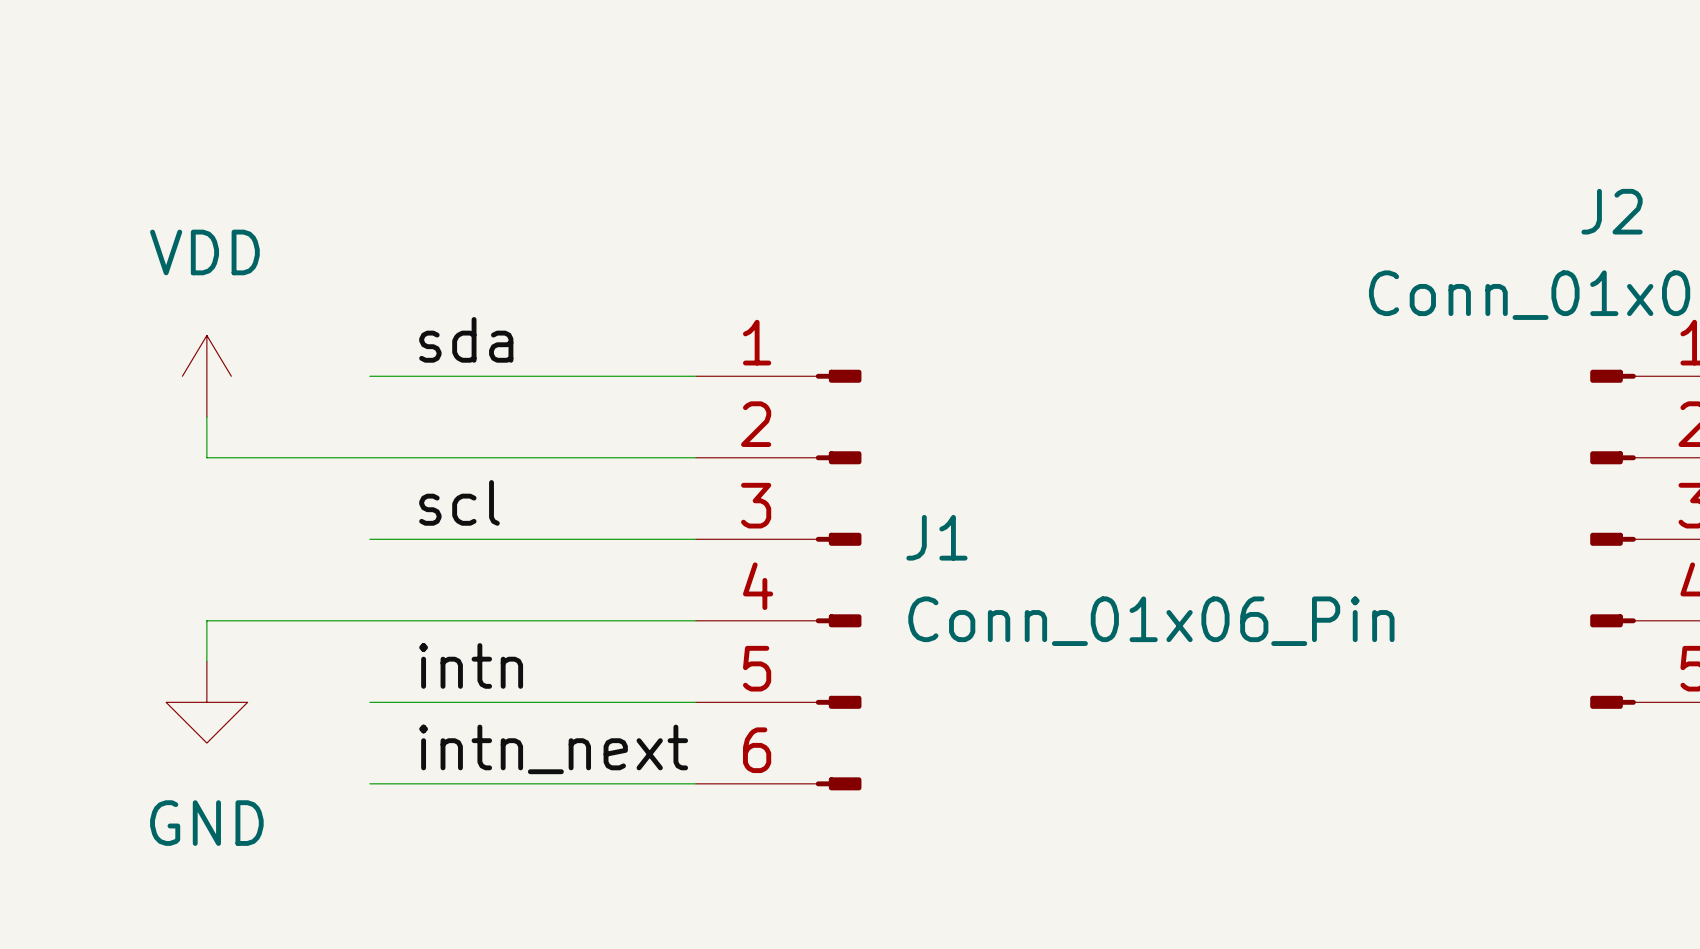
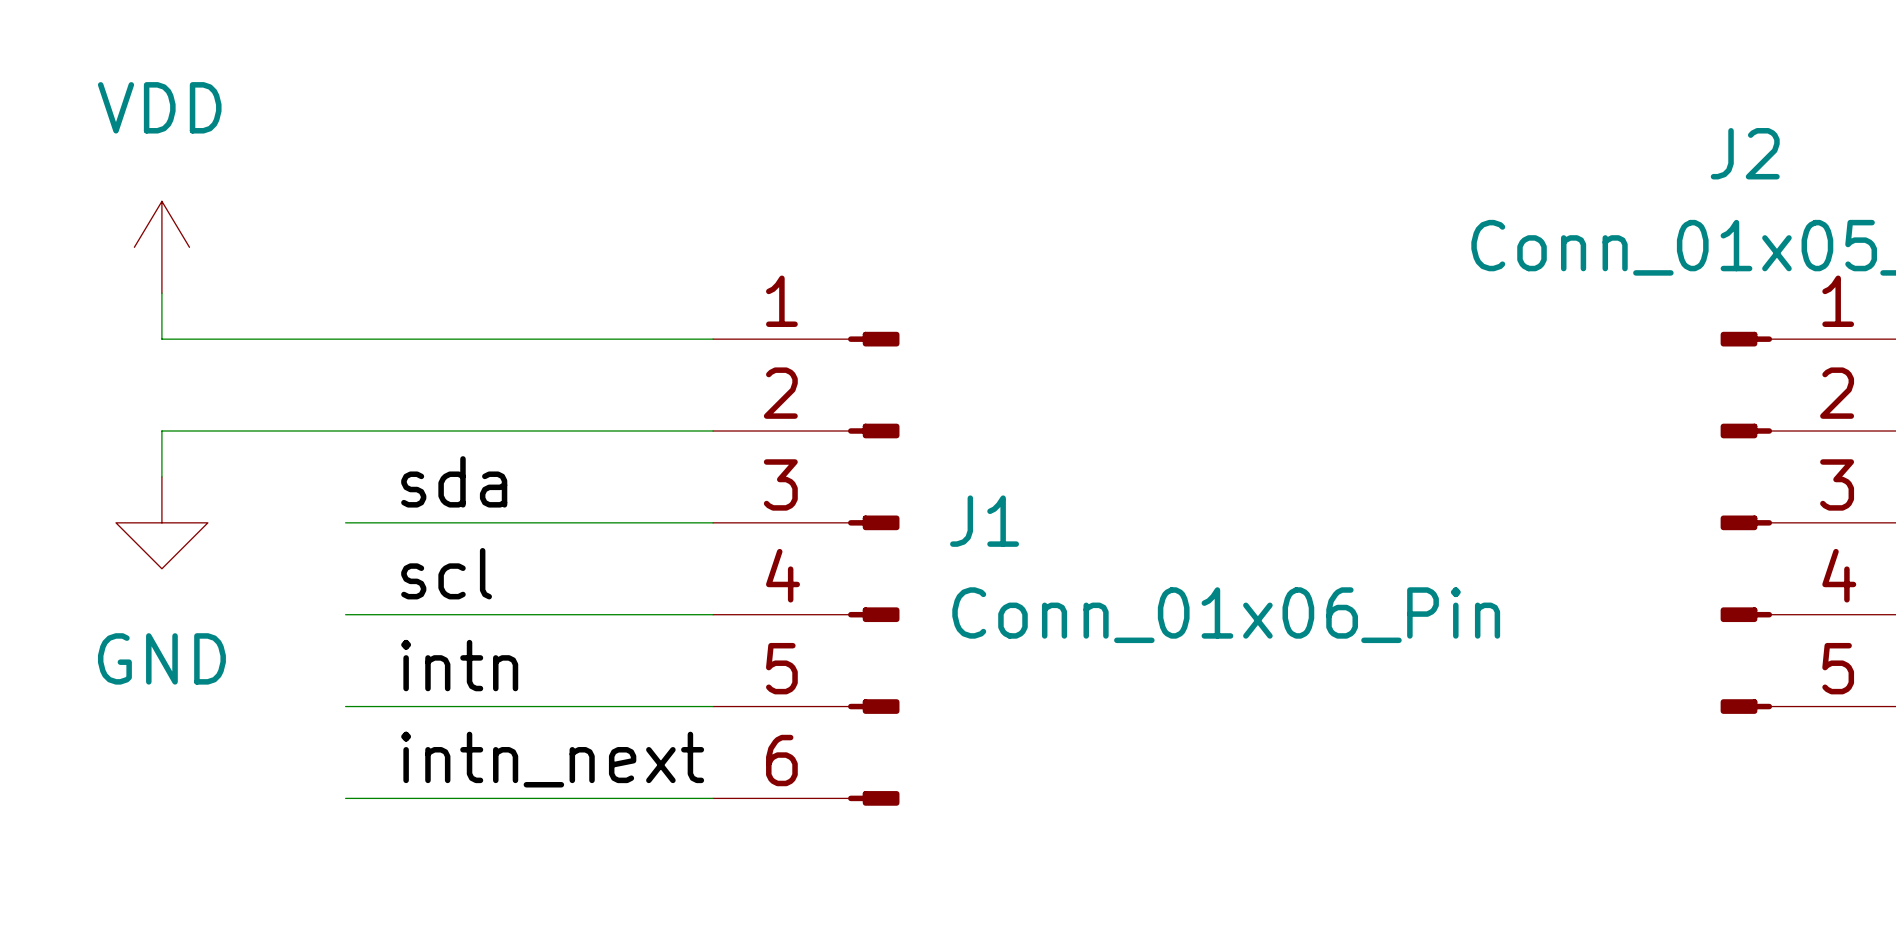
wire: none -> (161, 293) (161, 339) (345, 339)
label: sda (466, 339) -> none
power symbol position: VDD (206, 376) -> VDD (161, 247)
wire: (206, 417) (206, 457) -> (161, 476) (161, 431)
label: scl (459, 502) -> sda (454, 481)
label: none -> scl (446, 573)
wire: (369, 620) (206, 620) (206, 661) -> none
power symbol position: GND (206, 702) -> GND (161, 522)

